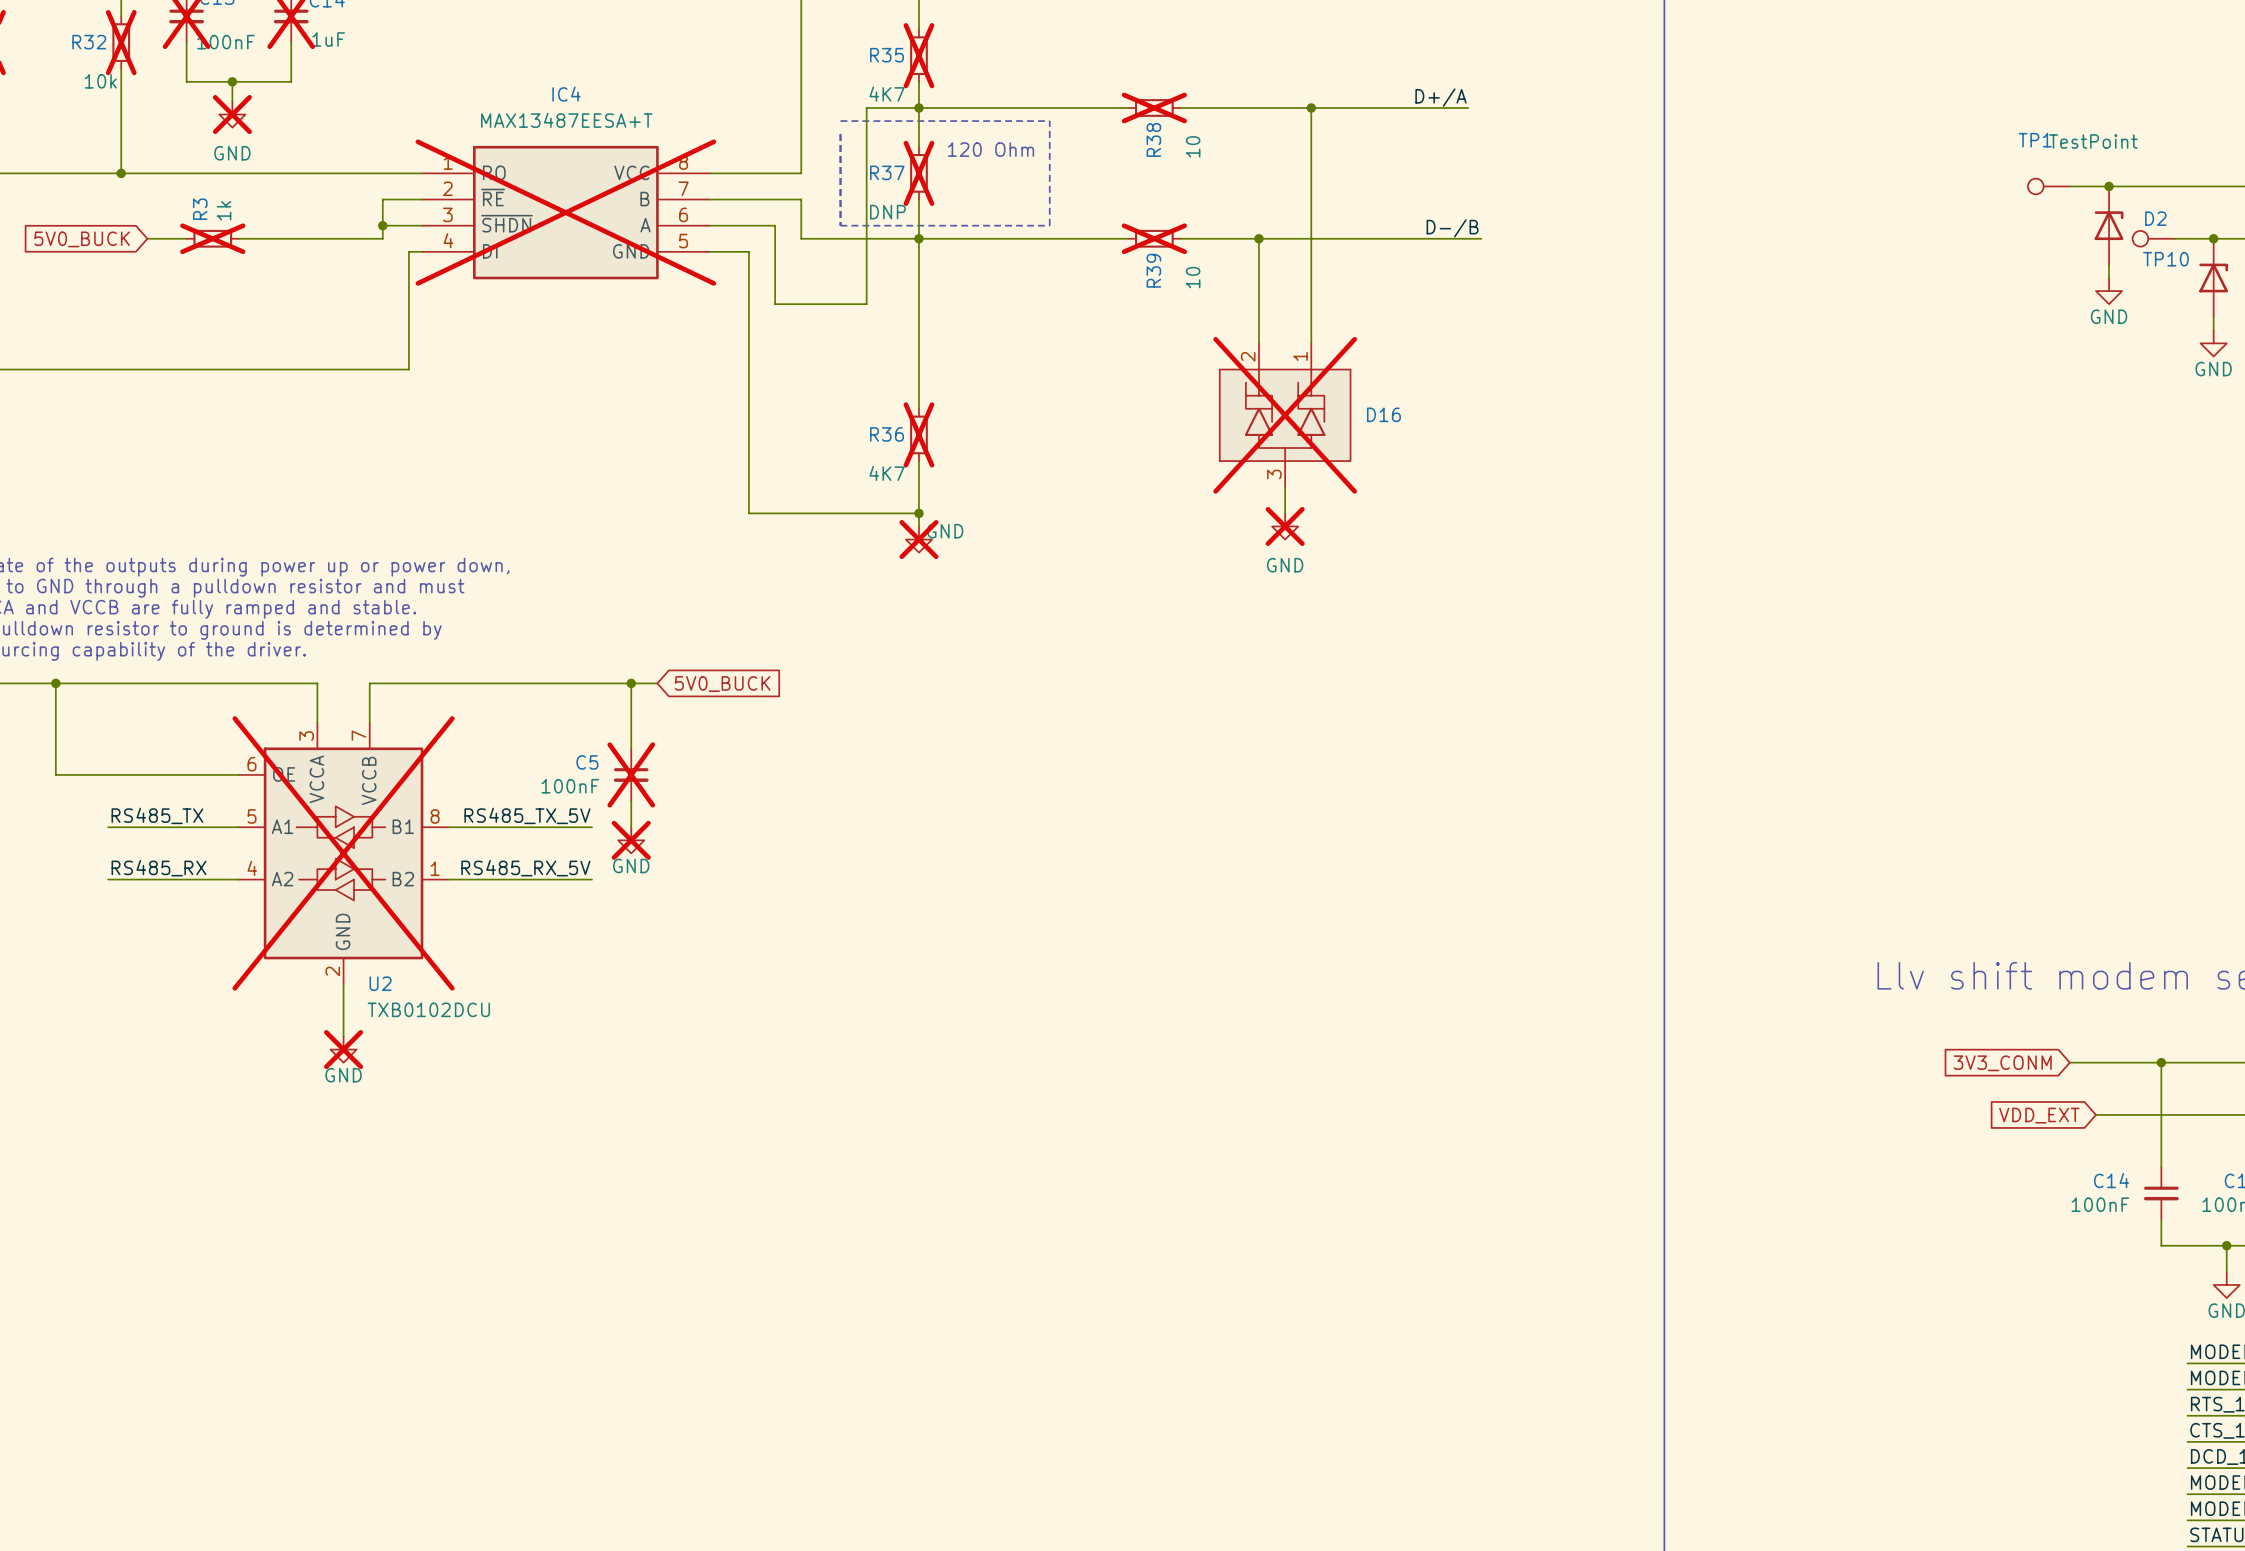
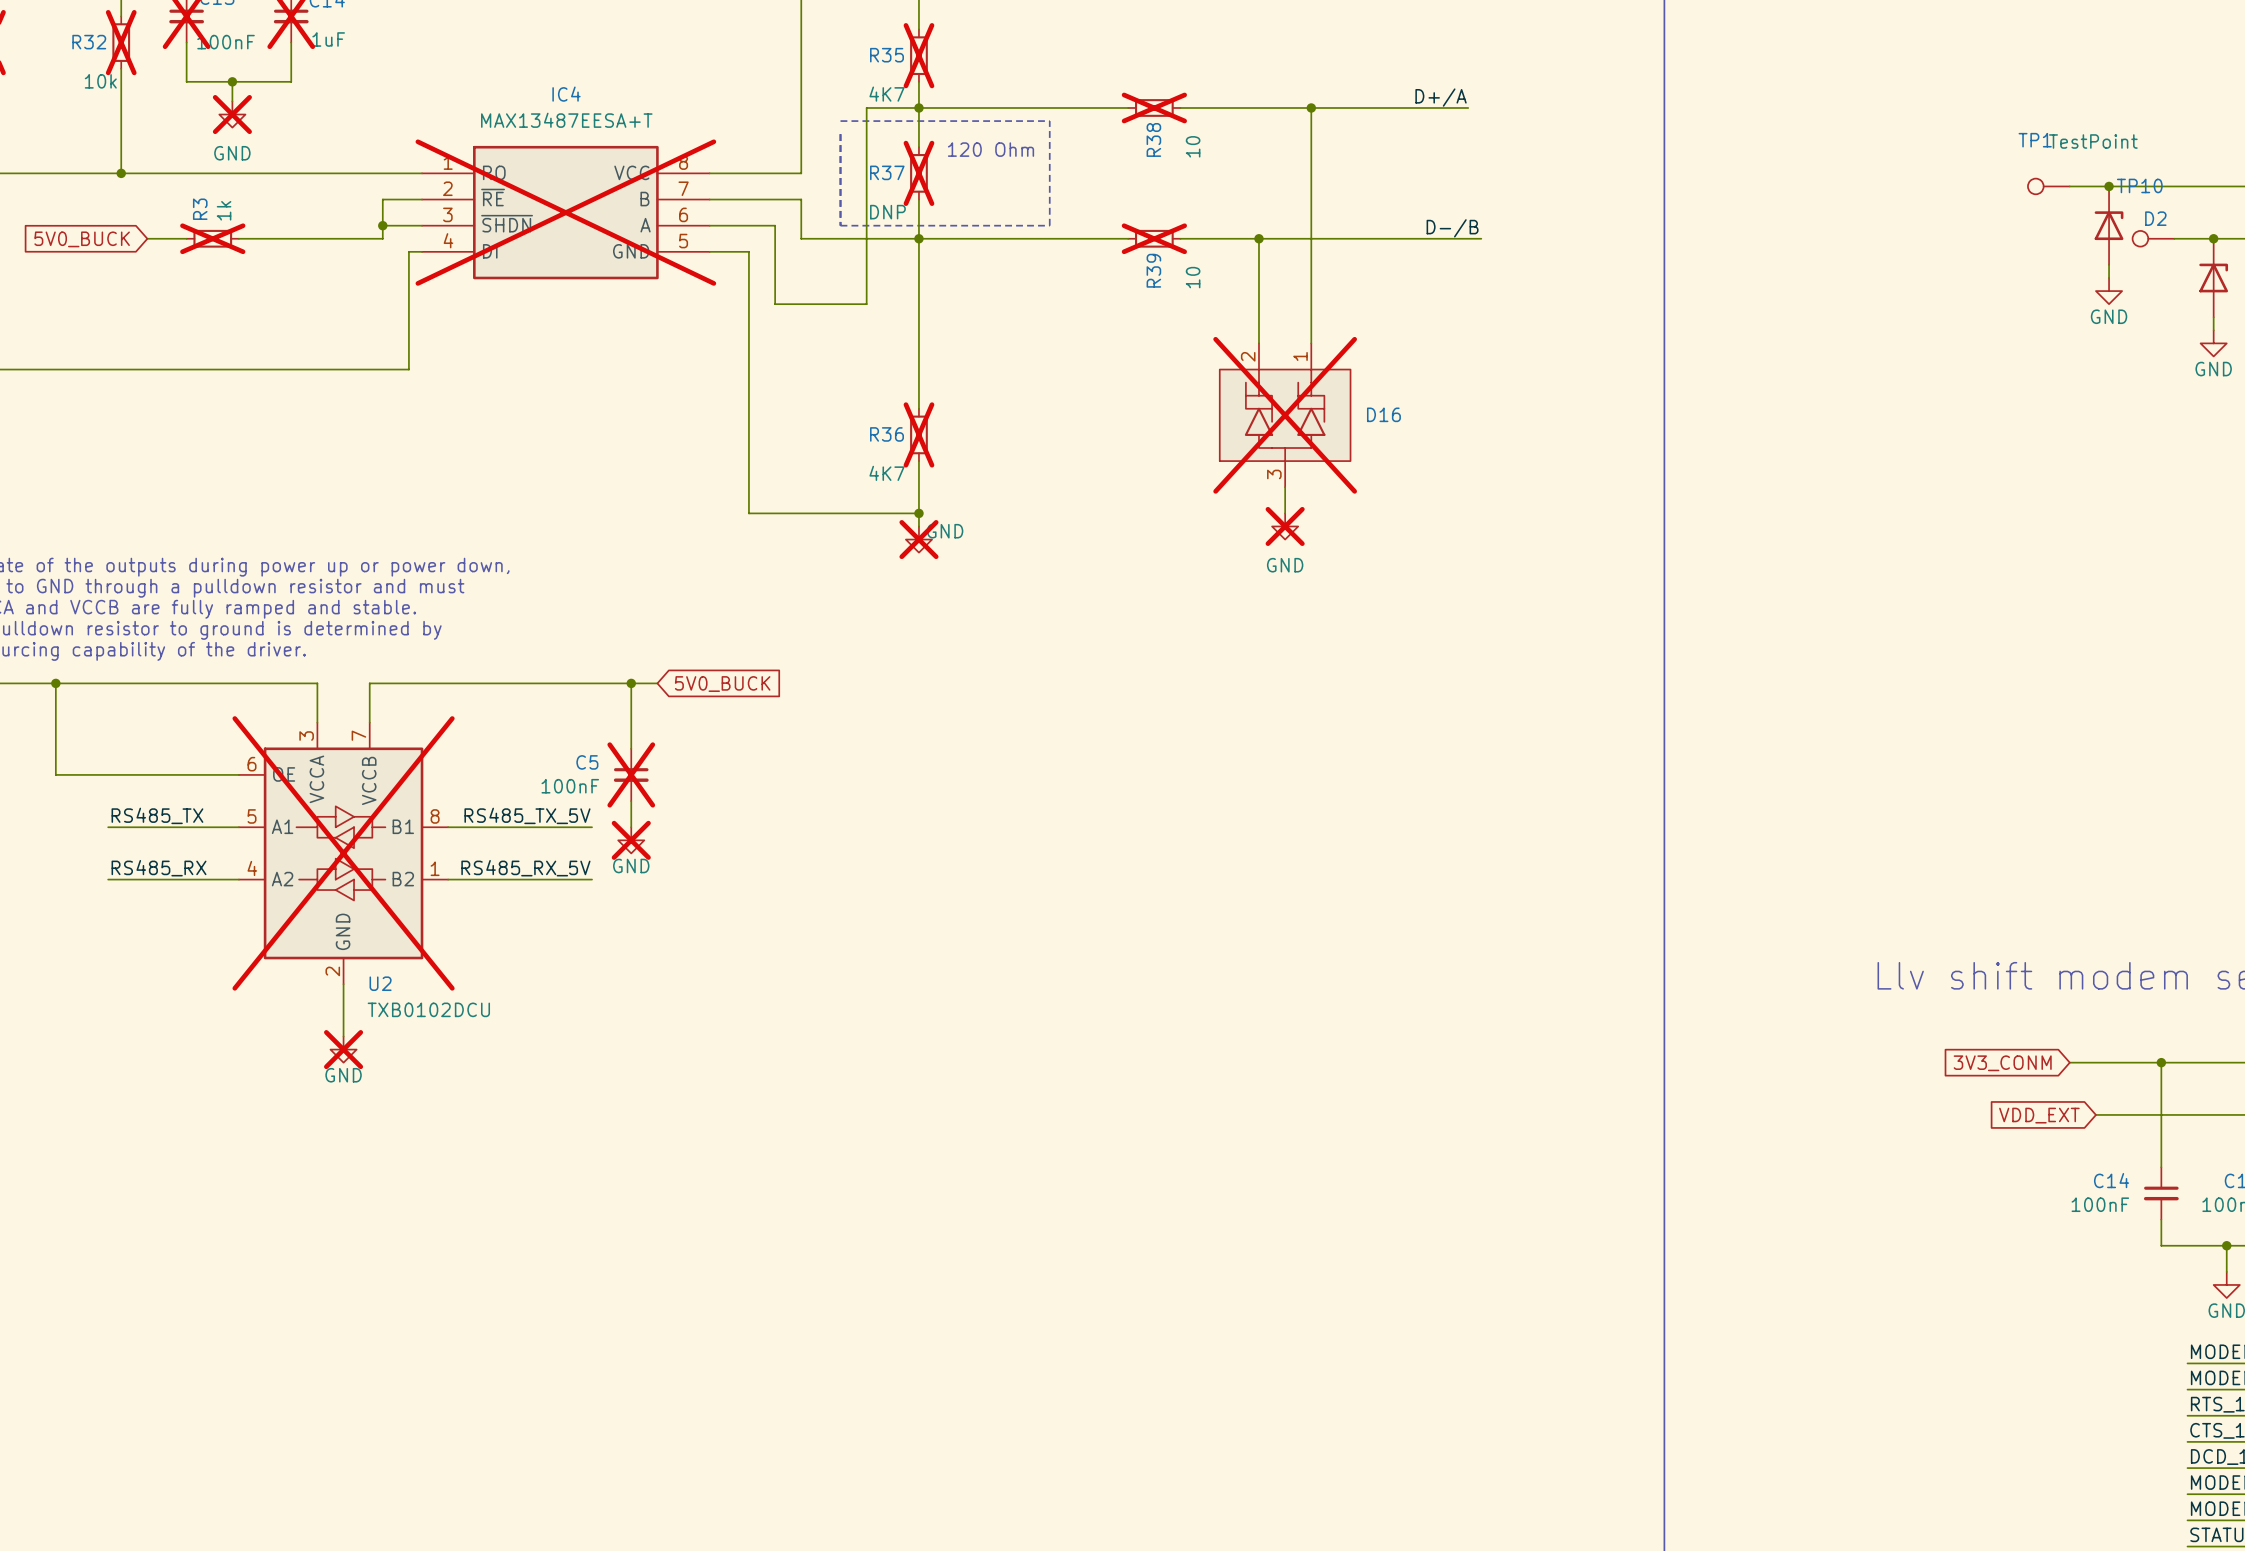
TP10 name position: TP10 (2165, 259) -> TP10 (2139, 185)

